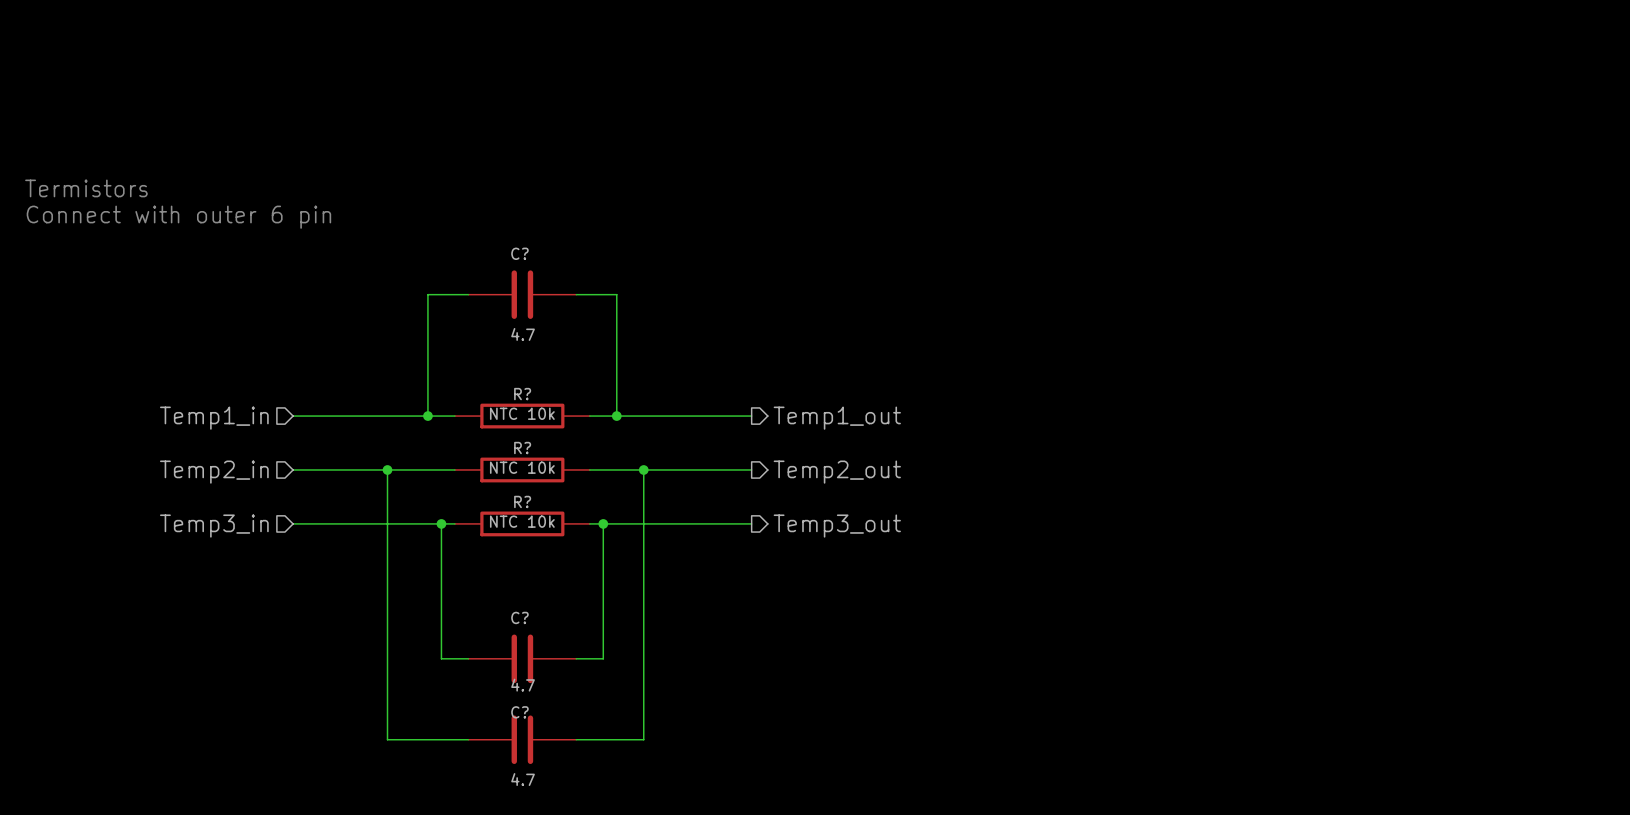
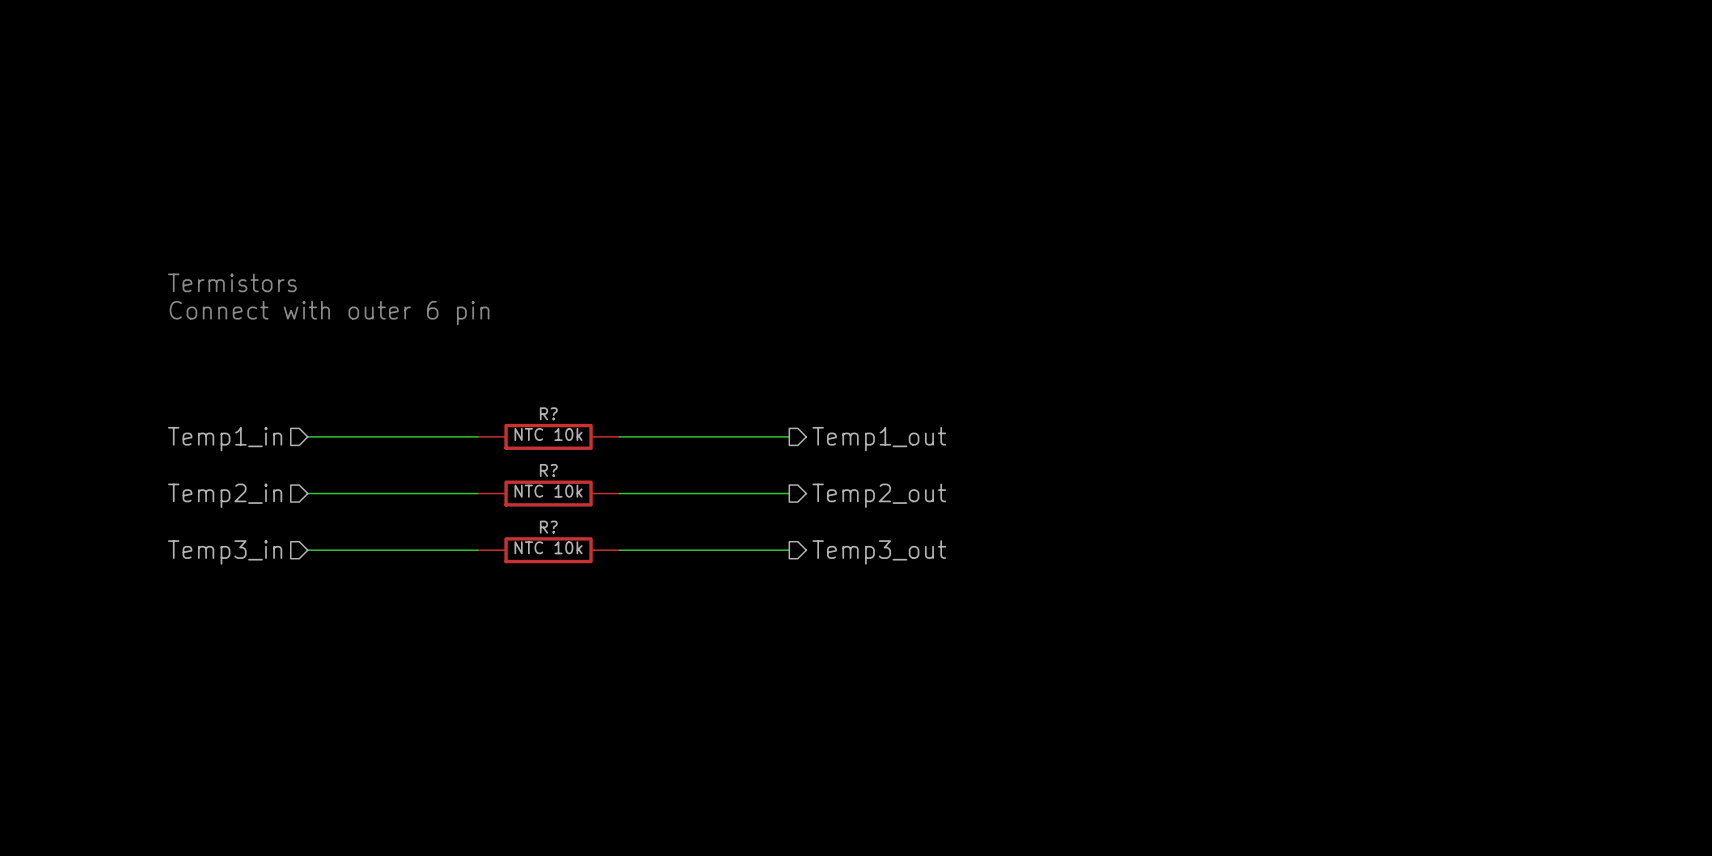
text position: Termistors (86, 188) -> Termistors (232, 282)
text position: Connect with outer 6 pin (178, 217) -> Connect with outer 6 pin (329, 313)
wire: (468, 294) (427, 294) (427, 416) -> none
C?: 4.7 (522, 294) -> none
wire: (576, 294) (616, 294) (616, 416) -> none
junction: (427, 416) -> none
junction: (616, 416) -> none
wire: (387, 469) (387, 739) (468, 739) -> none
junction: (387, 469) -> none
wire: (643, 469) (643, 739) (576, 739) -> none
junction: (643, 469) -> none
wire: (441, 523) (441, 658) (468, 658) -> none
junction: (441, 523) -> none
wire: (603, 523) (603, 658) (576, 658) -> none
junction: (603, 523) -> none
C?: 4.7 (522, 658) -> none
C?: 4.7 (522, 739) -> none

